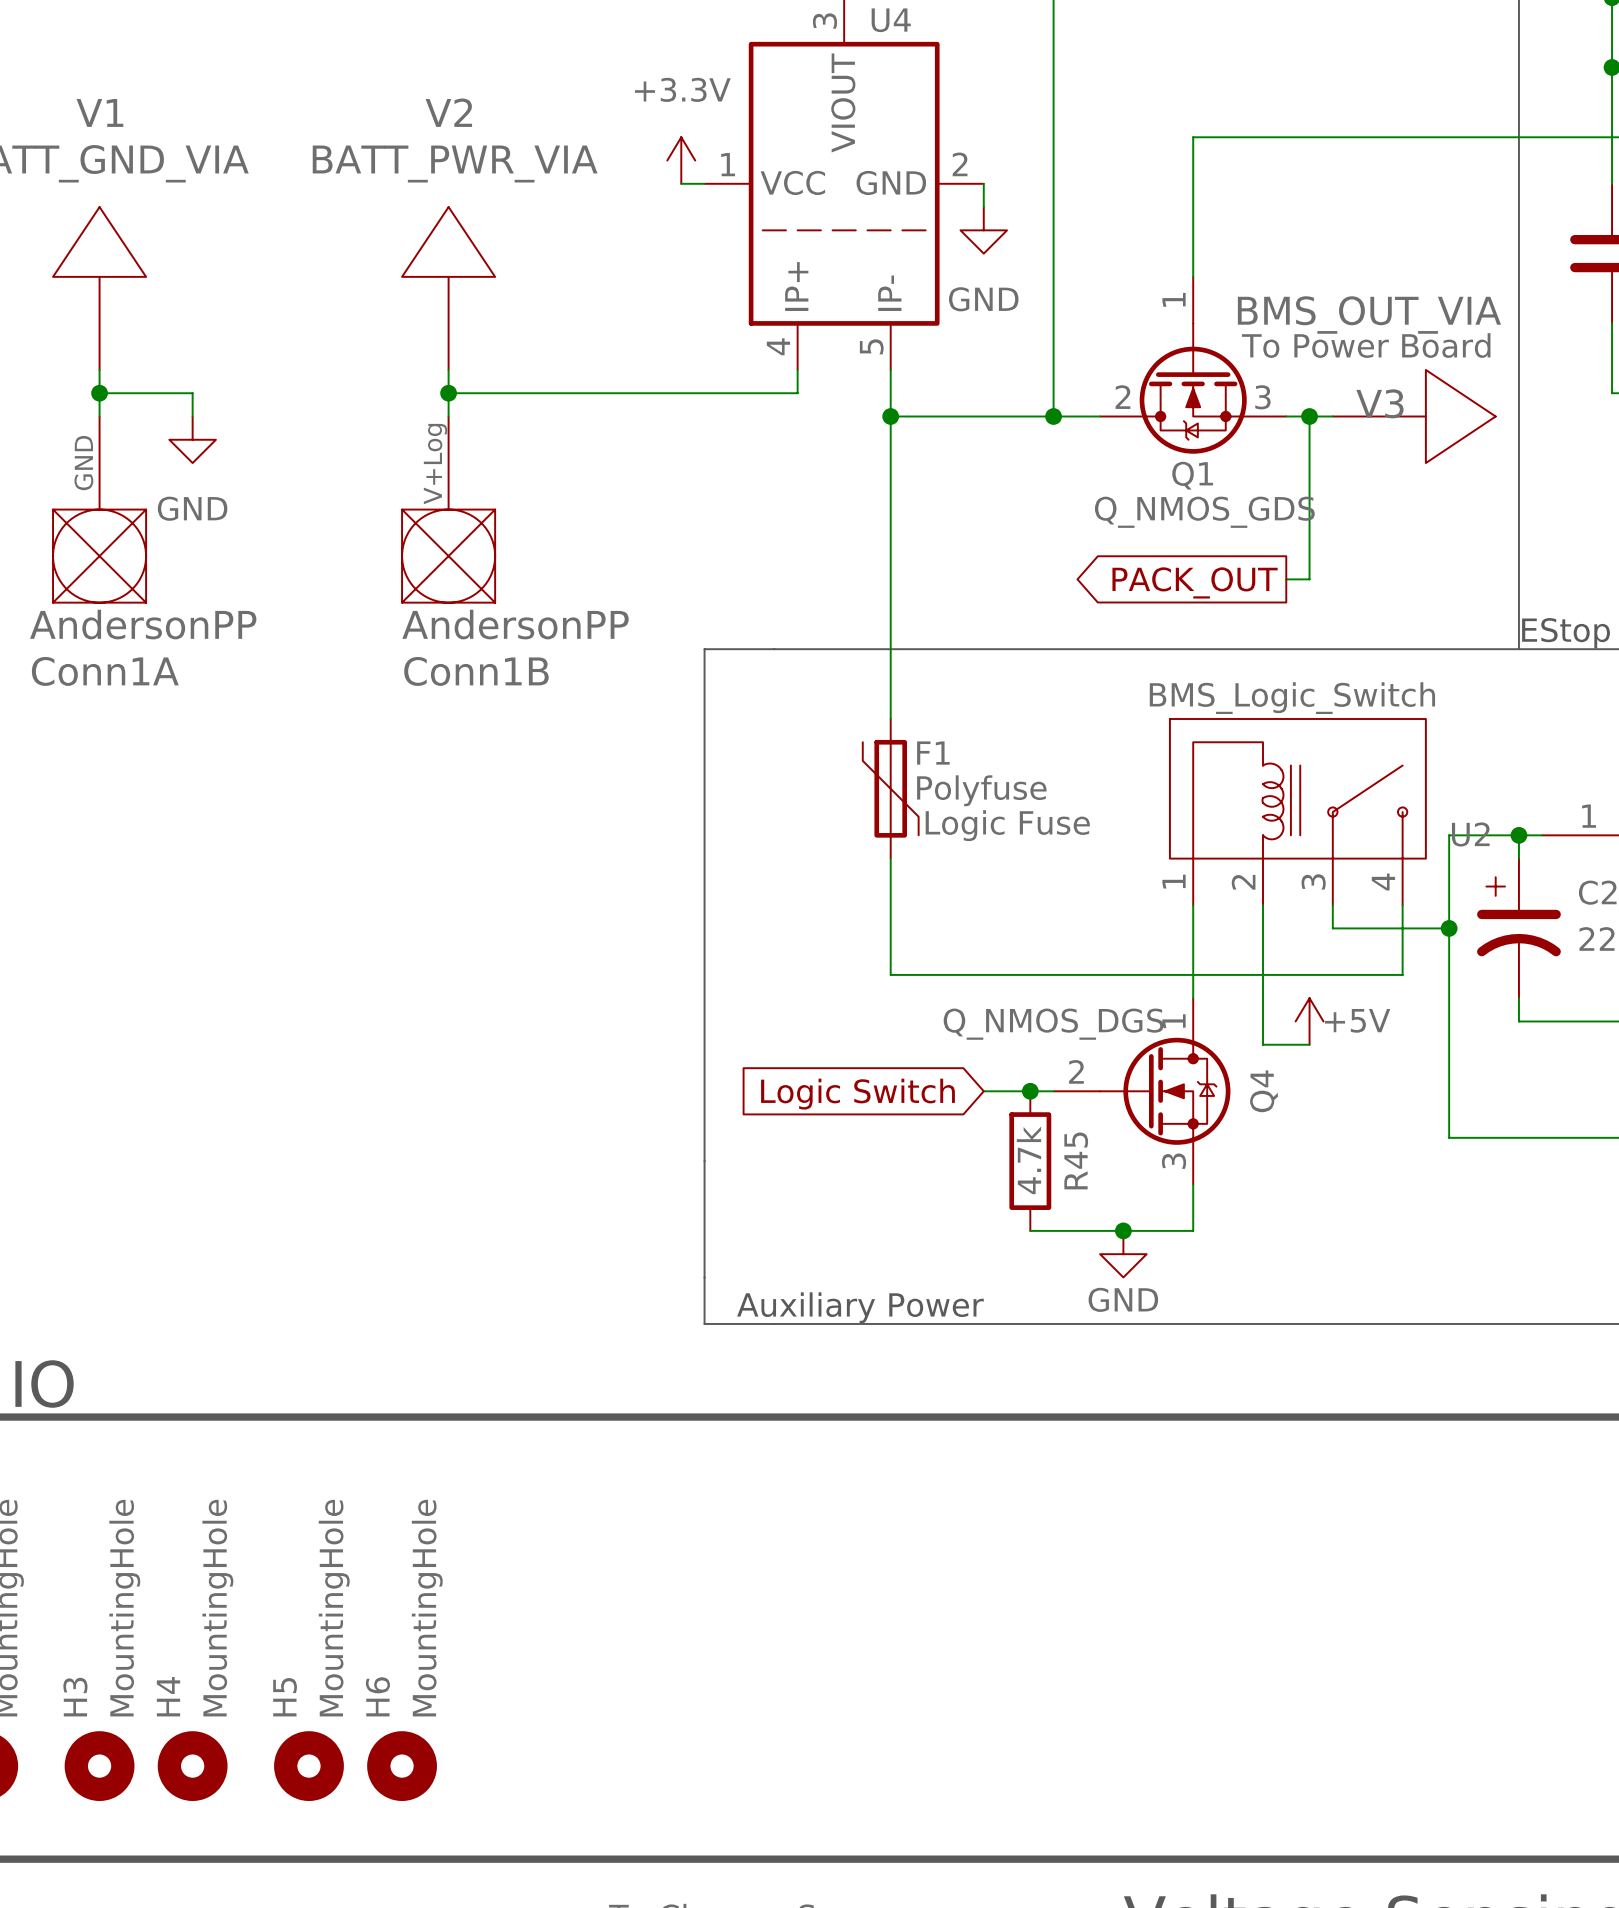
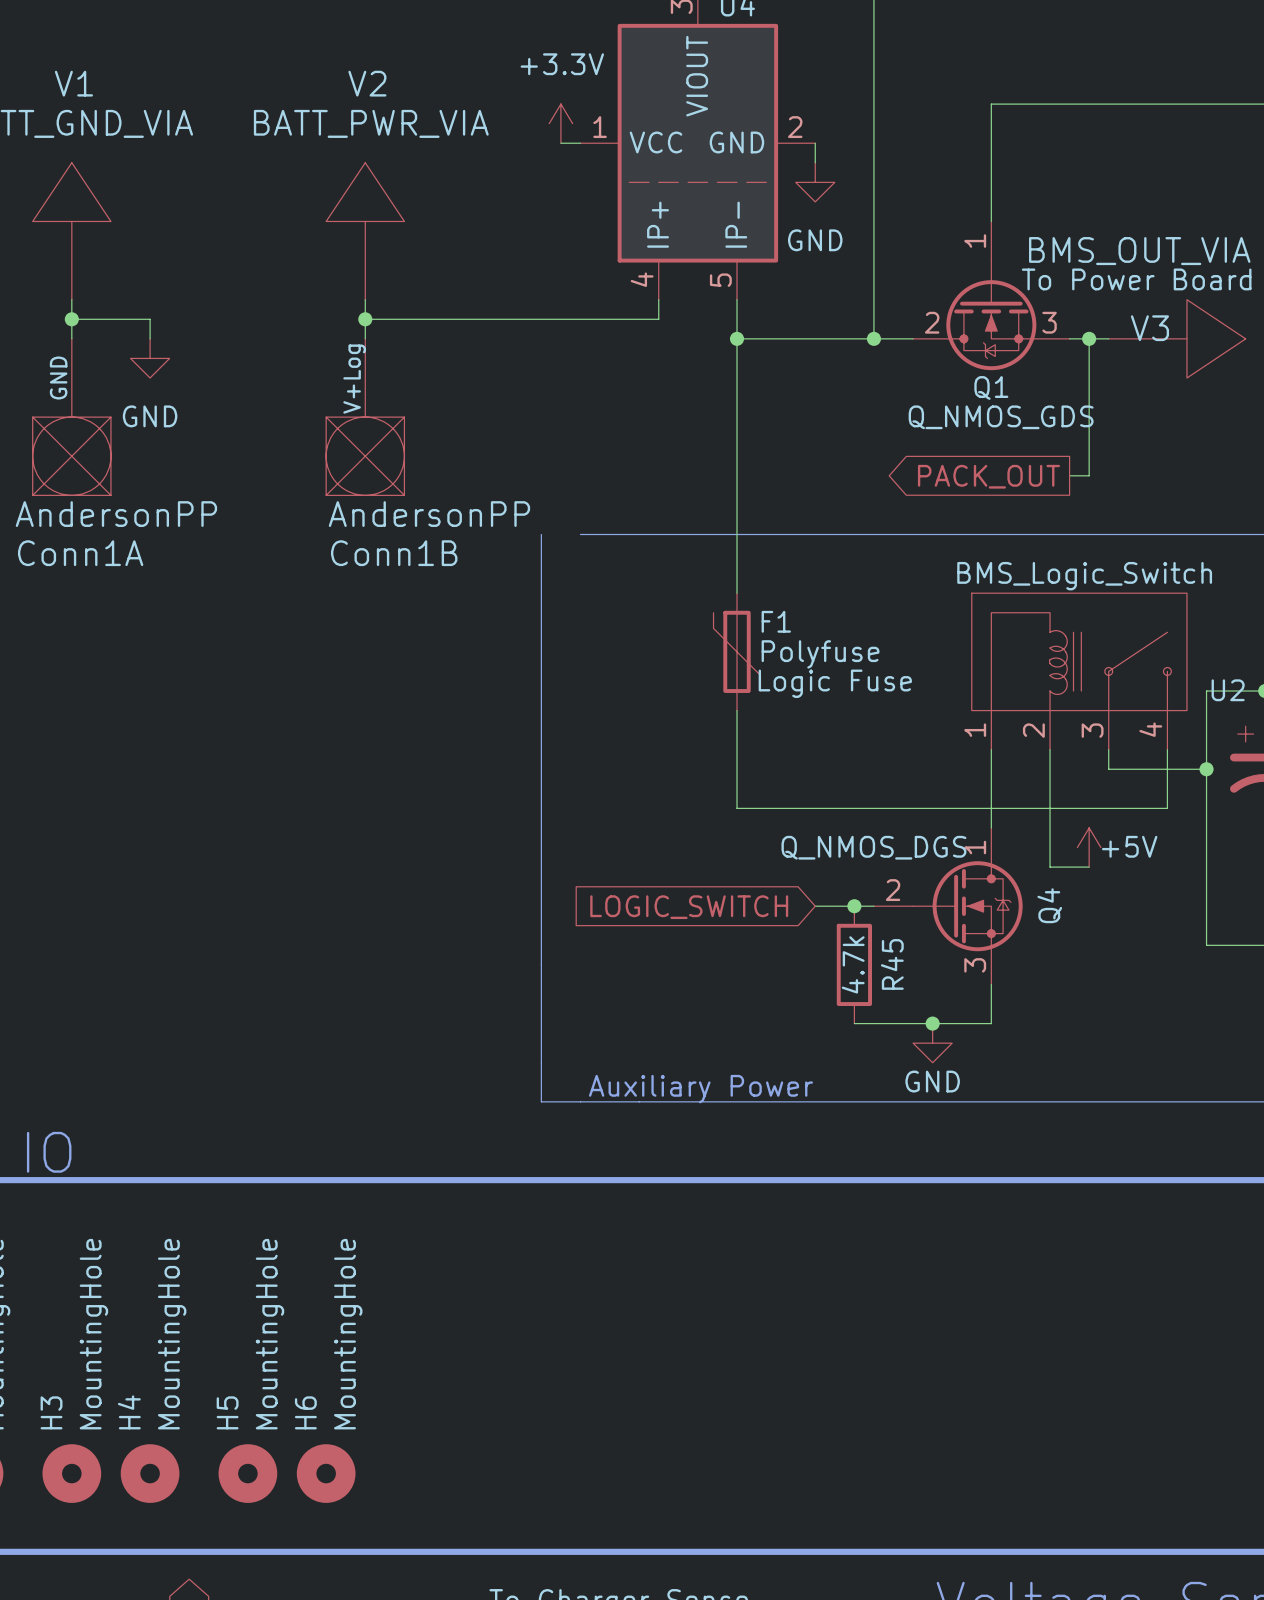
line: (704, 649) (704, 1323) -> (541, 534) (541, 1101) (580, 1101)
global label: Logic Switch (857, 1094) -> LOGIC_SWITCH (689, 907)

